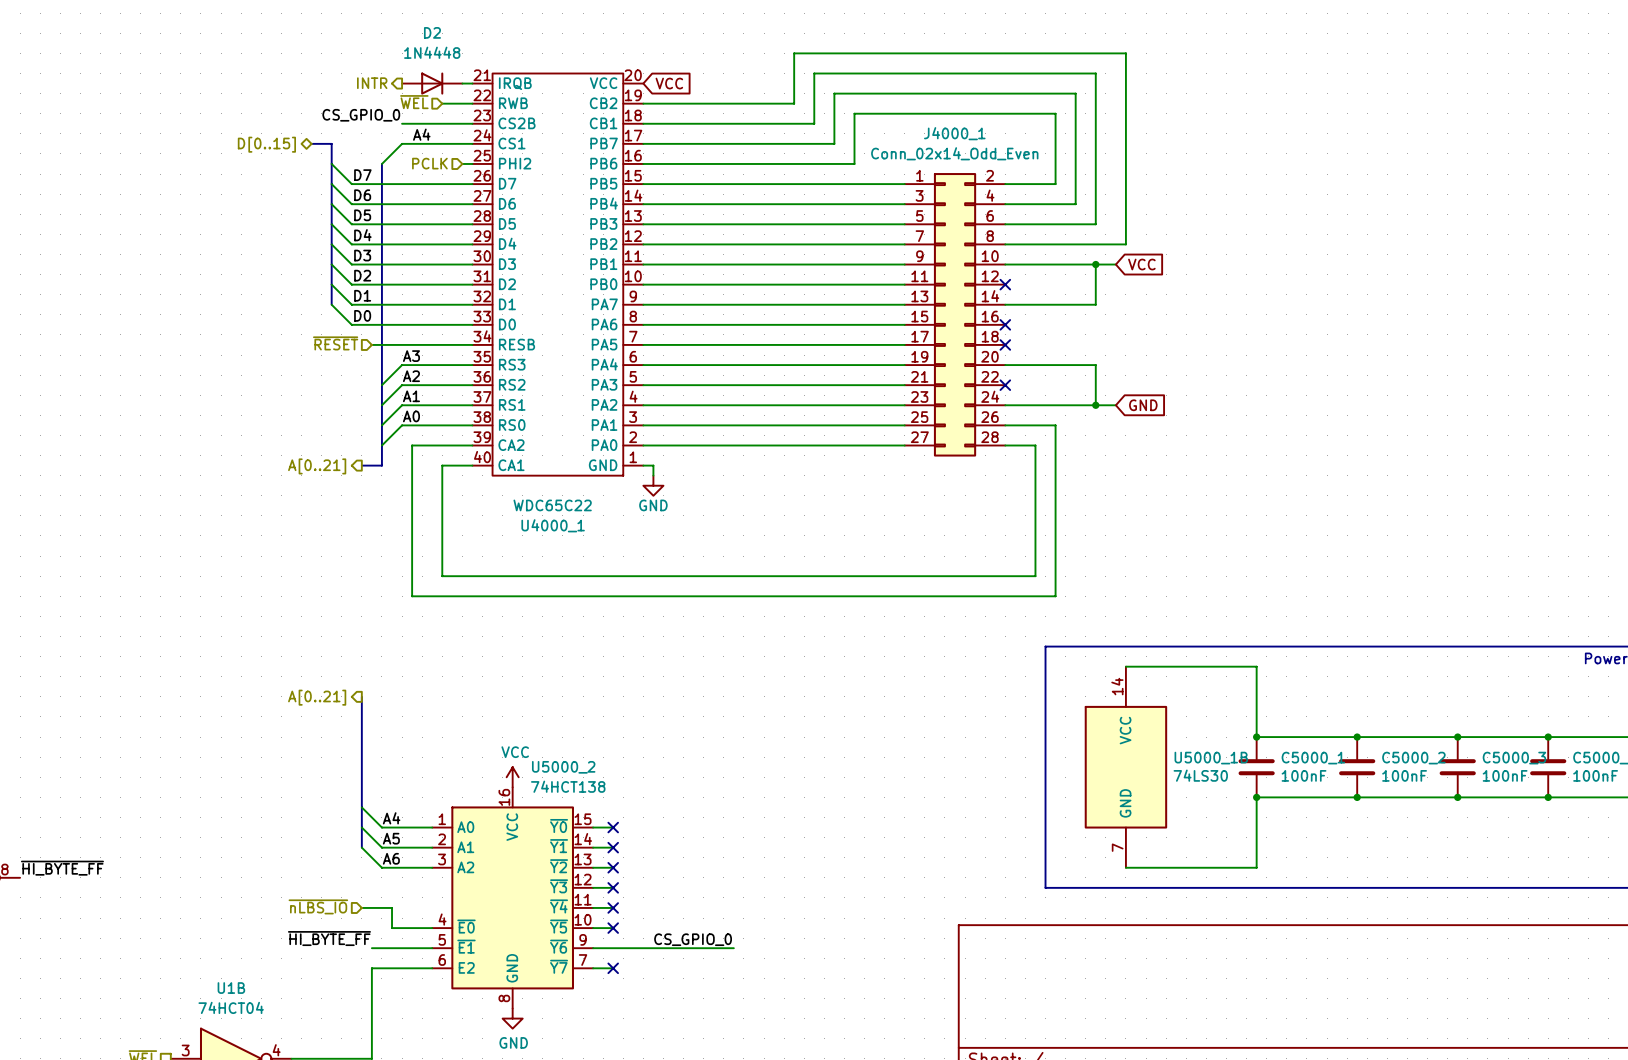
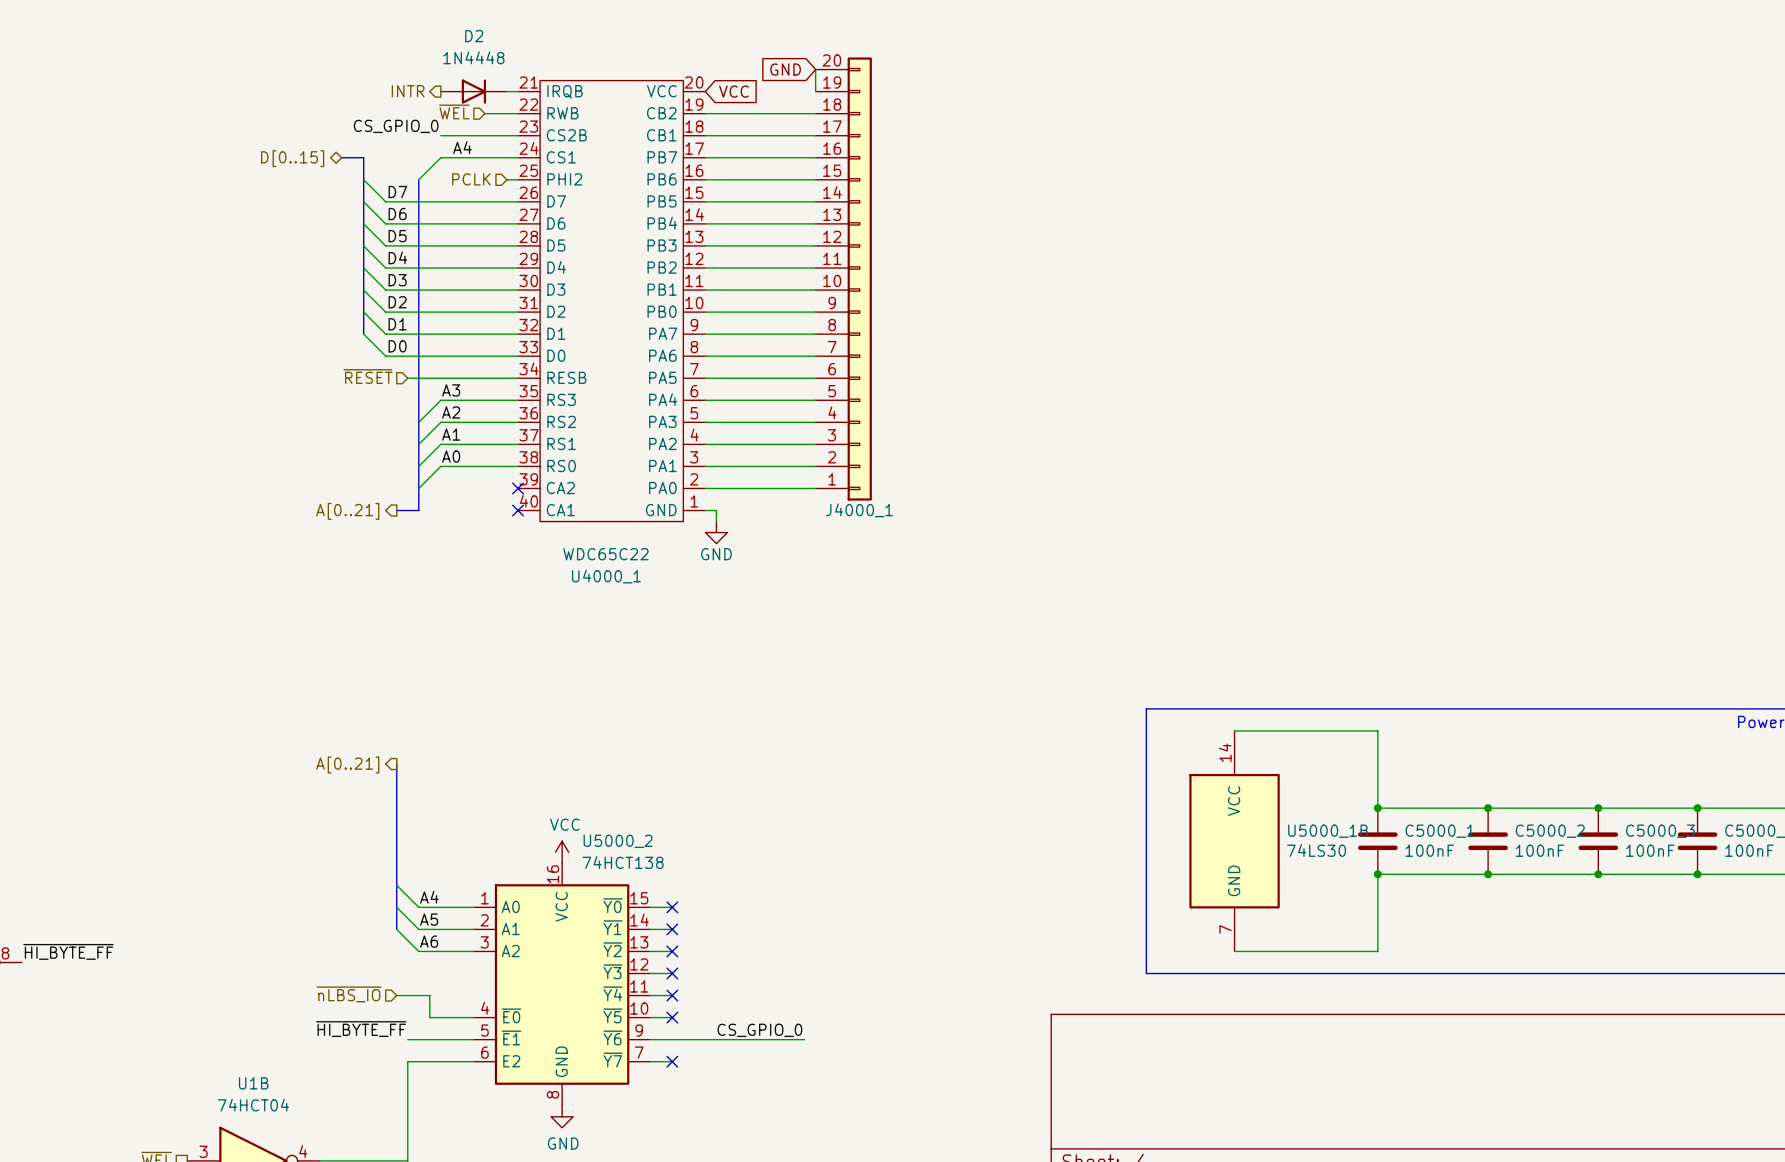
global label: none -> GND (785, 69)
wire: none -> (815, 69) (815, 91)
wire: (743, 103) (794, 103) (794, 53) (1125, 53) (1125, 244) (1005, 244) -> none
wire: (743, 123) (814, 123) (814, 73) (1095, 73) (1095, 224) (1005, 224) -> none
J4000_1 name position: J4000_1 (954, 133) -> J4000_1 (859, 510)
wire: (743, 143) (834, 143) (834, 93) (1075, 93) (1075, 204) (1005, 204) -> none
J4000_1 value: Conn_02x14_Odd_Even (954, 153) -> none
wire: (743, 163) (854, 163) (854, 113) (1055, 113) (1055, 184) (1005, 184) -> none
J4000_1 symbol: [904, 173, 1006, 457] -> [815, 57, 872, 501]
wire: (743, 184) (904, 184) -> none
wire: (743, 204) (904, 204) -> none
wire: (743, 224) (904, 224) -> none
wire: (743, 244) (904, 244) -> none
wire: (743, 264) (904, 264) -> none
wire: (1005, 264) (1115, 264) -> none
wire: (1095, 264) (1095, 304) (1005, 304) -> none
junction: (1095, 264) -> none
global label: VCC (1141, 264) -> none
wire: (743, 284) (904, 284) -> none
no-connect mark: (1005, 284) -> none
wire: (743, 304) (904, 304) -> none
wire: (743, 324) (904, 324) -> none
no-connect mark: (1005, 324) -> none
wire: (743, 344) (904, 344) -> none
no-connect mark: (1005, 344) -> none
wire: (743, 365) (904, 365) -> none
wire: (1005, 365) (1095, 365) (1095, 405) -> none
wire: (743, 385) (904, 385) -> none
no-connect mark: (1005, 385) -> none
wire: (743, 405) (904, 405) -> none
wire: (1005, 405) (1115, 405) -> none
junction: (1095, 405) -> none
global label: GND (1143, 405) -> none
wire: (743, 425) (904, 425) -> none
wire: (1005, 425) (1055, 425) (1055, 596) (412, 596) (412, 445) (472, 445) -> none
no-connect mark: none -> (518, 488)
wire: (743, 445) (904, 445) -> none
wire: (1005, 445) (1035, 445) (1035, 576) (442, 576) (442, 465) (472, 465) -> none
no-connect mark: none -> (518, 510)

